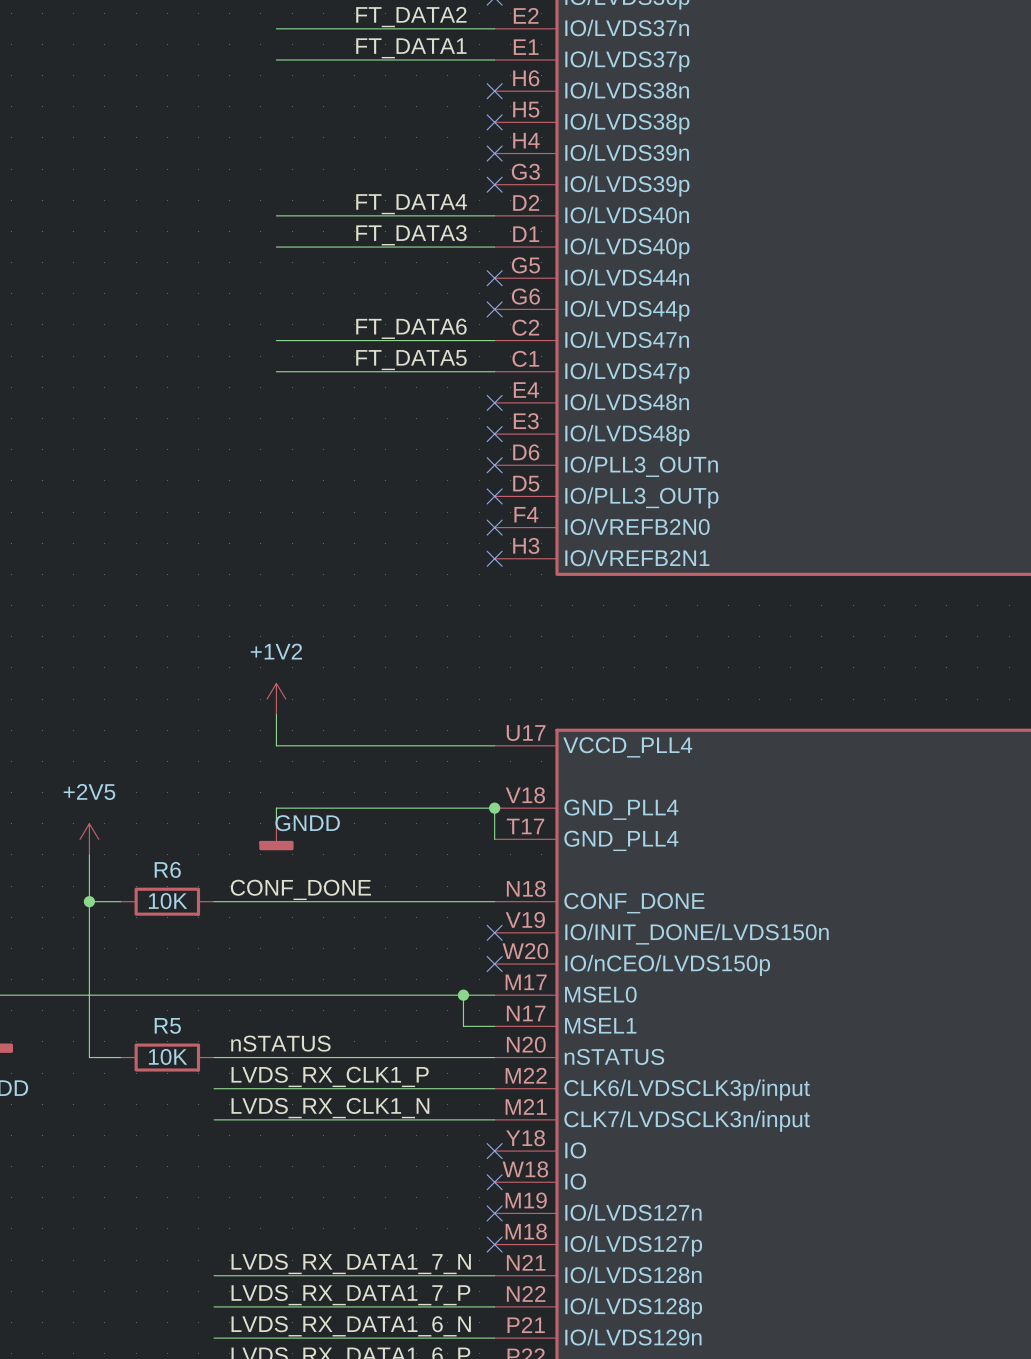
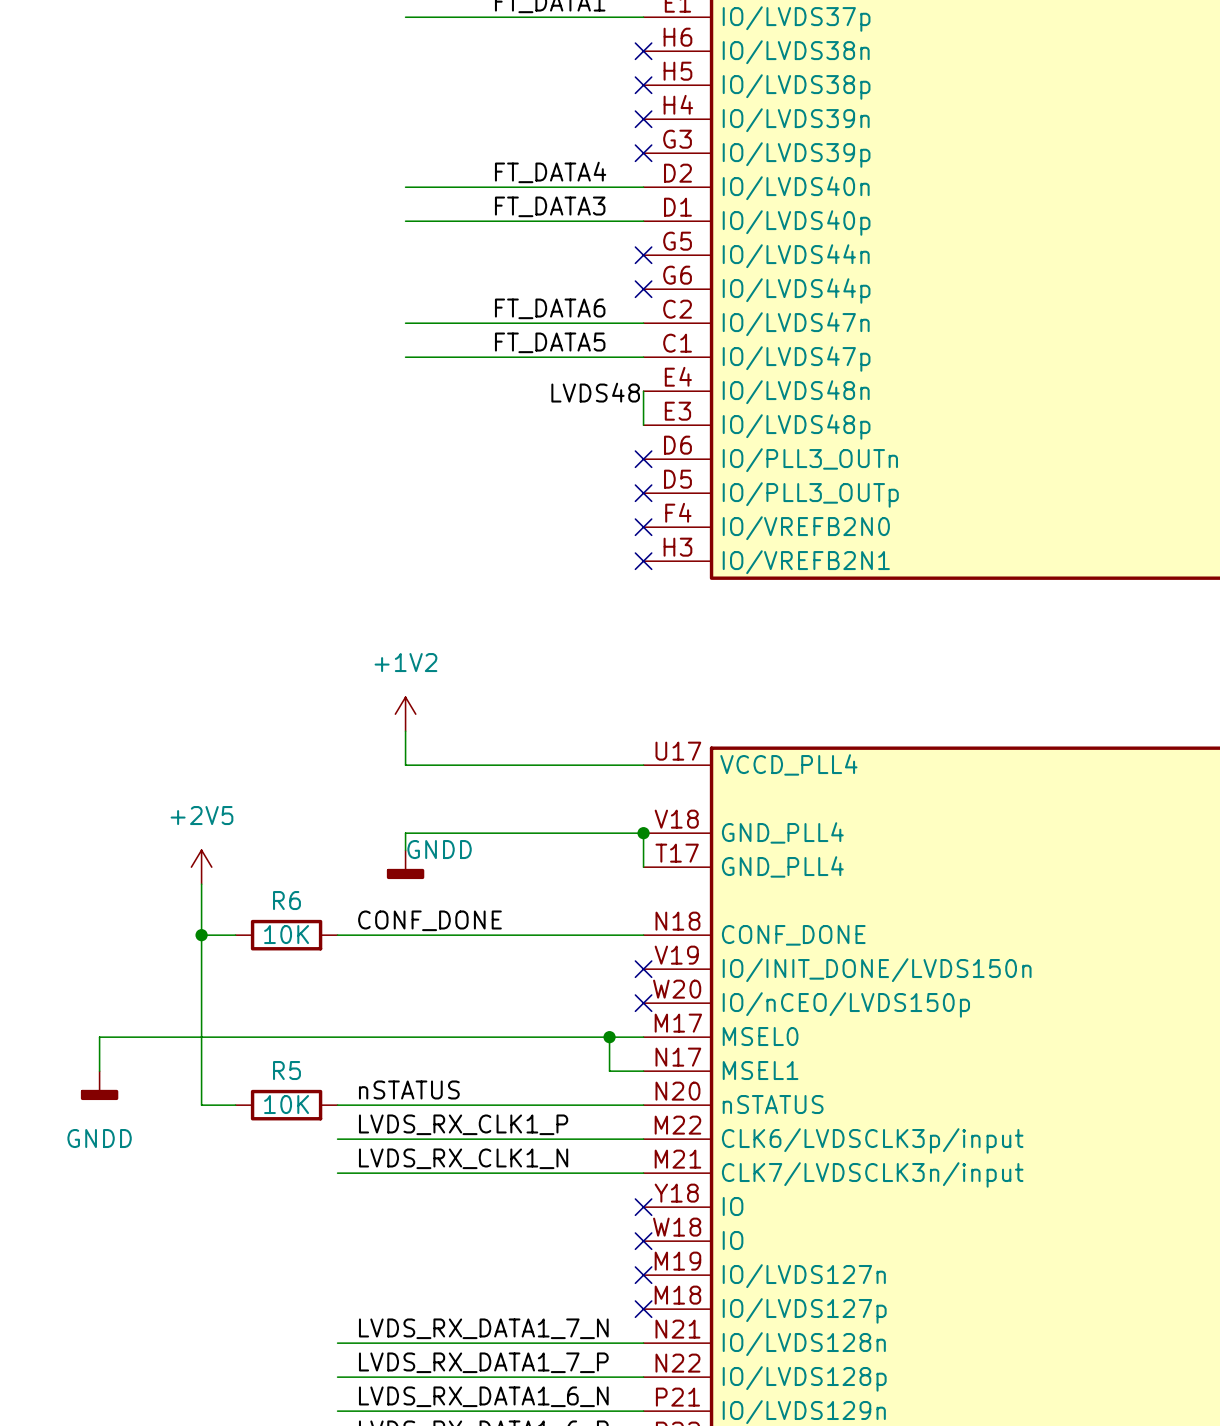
wire: none -> (643, 391) (643, 425)
no-connect mark: (494, 402) -> none
label: none -> LVDS48 (595, 392)
no-connect mark: (494, 434) -> none

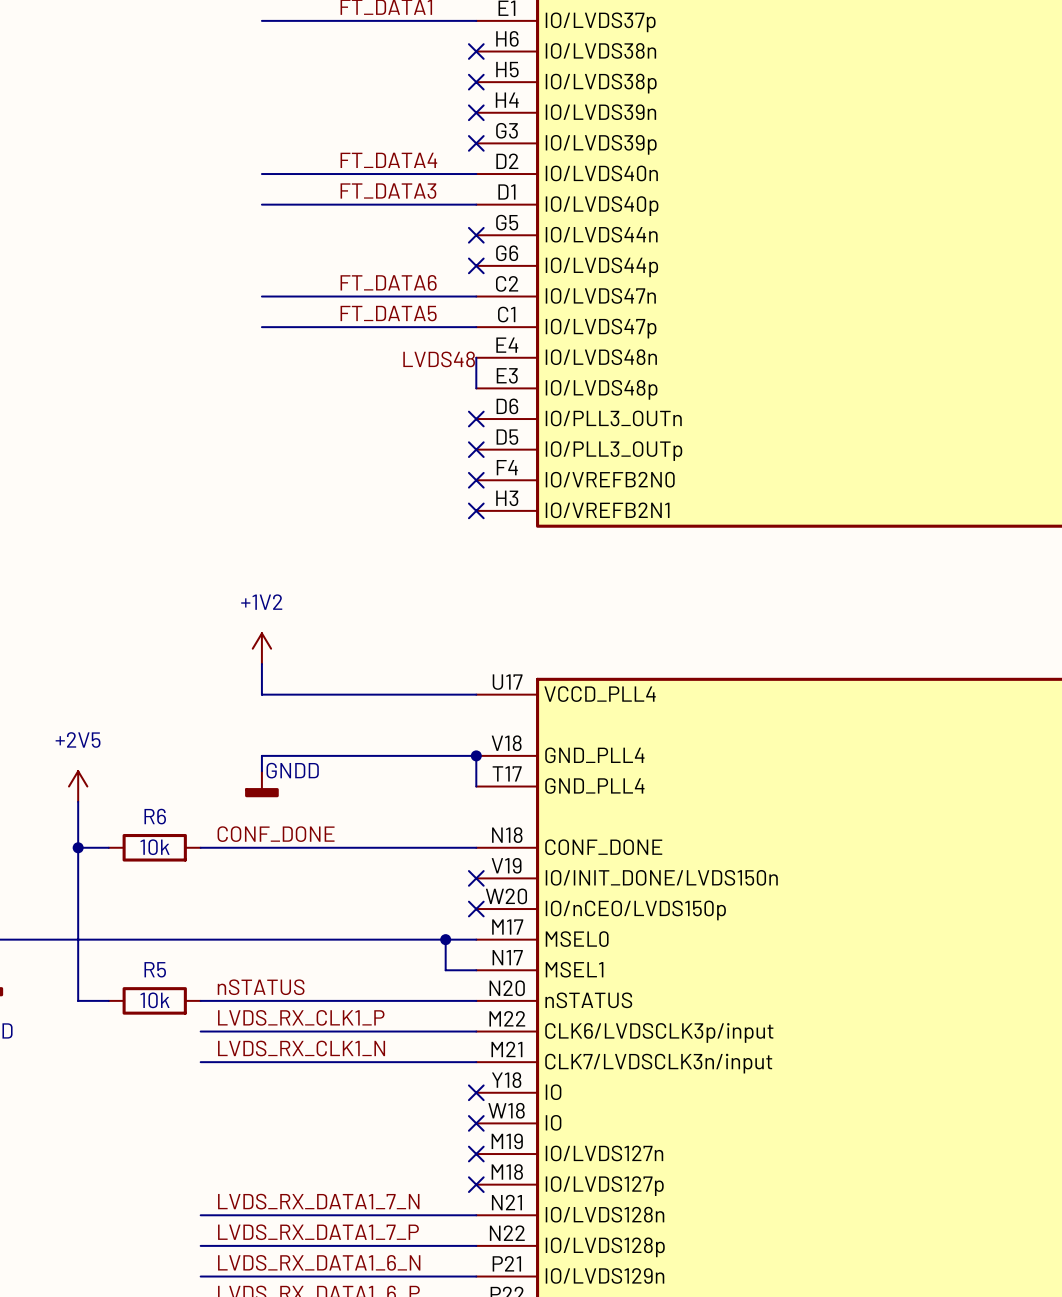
R6 value: 10K (286, 934) -> 10k (155, 847)
R5 value: 10K (286, 1104) -> 10k (155, 1000)

